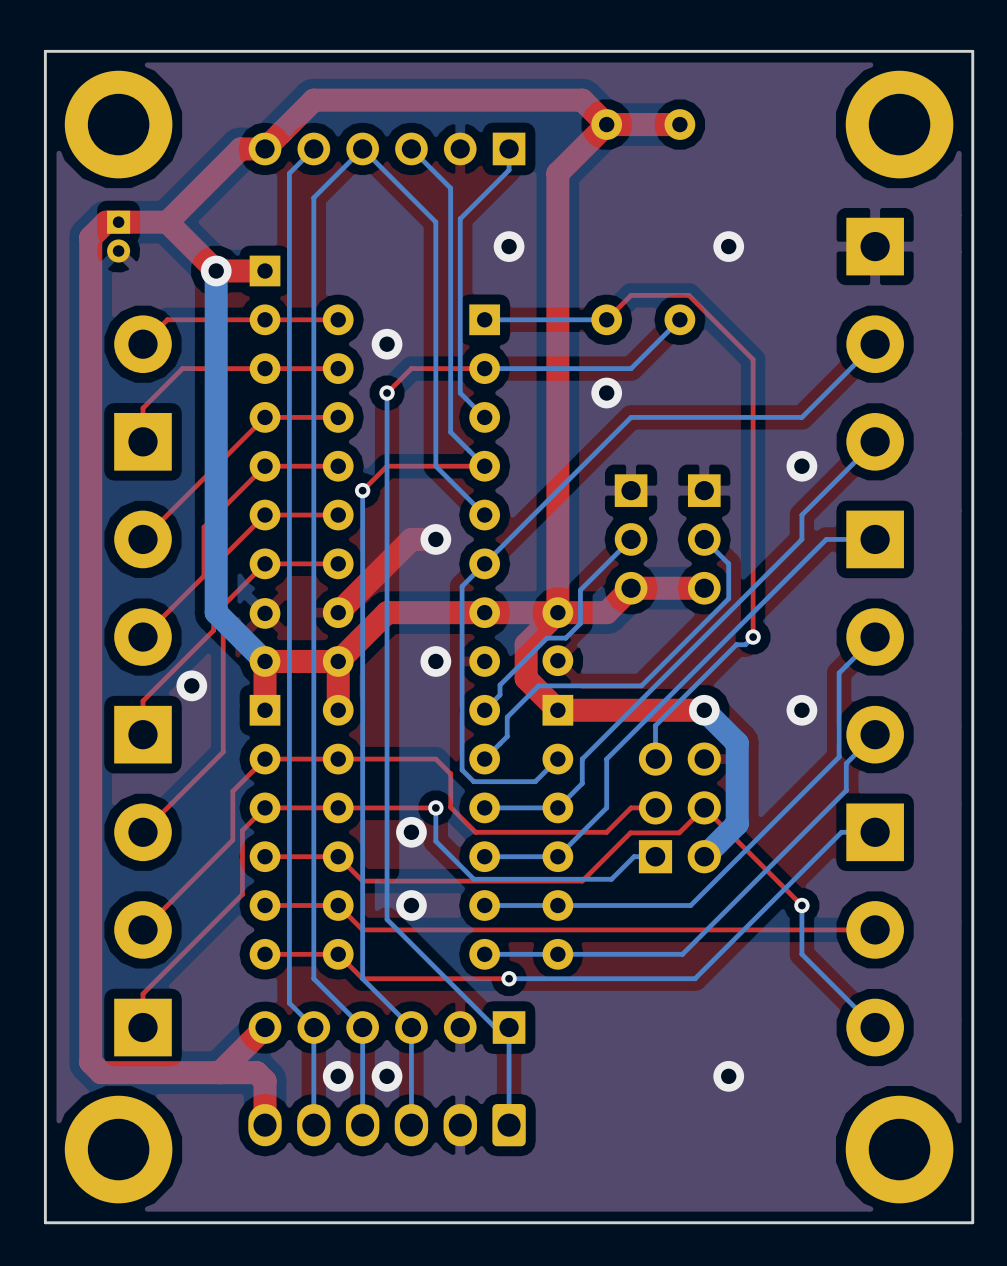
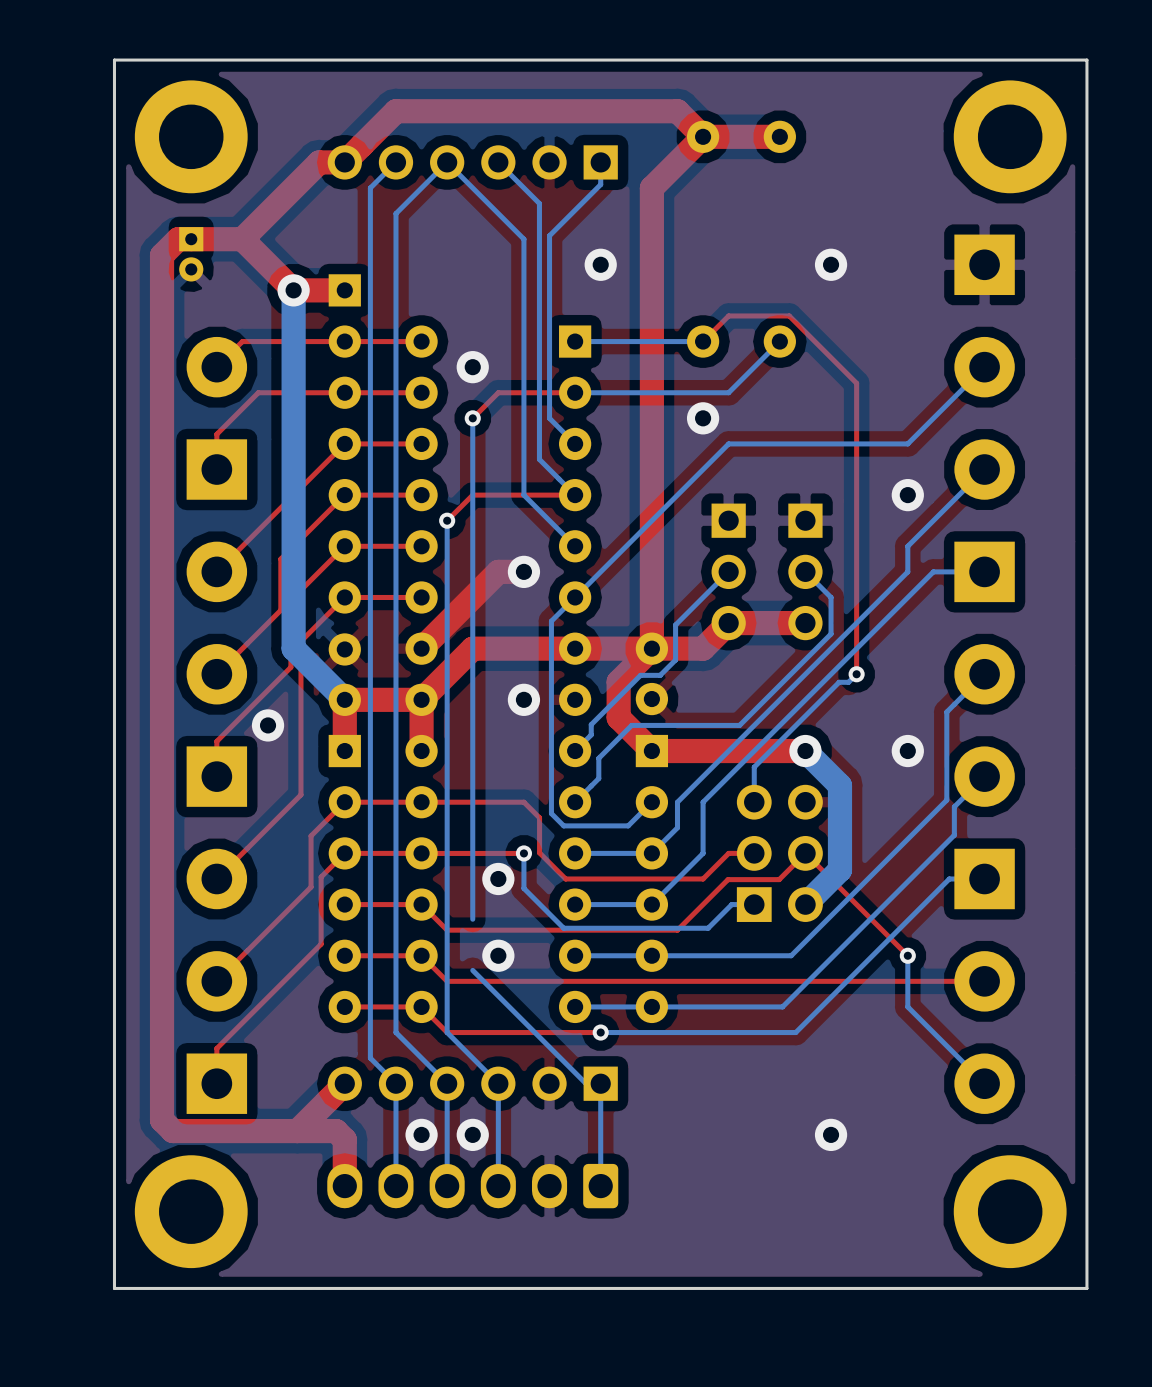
bottom track: (387, 870) (387, 919) -> none

